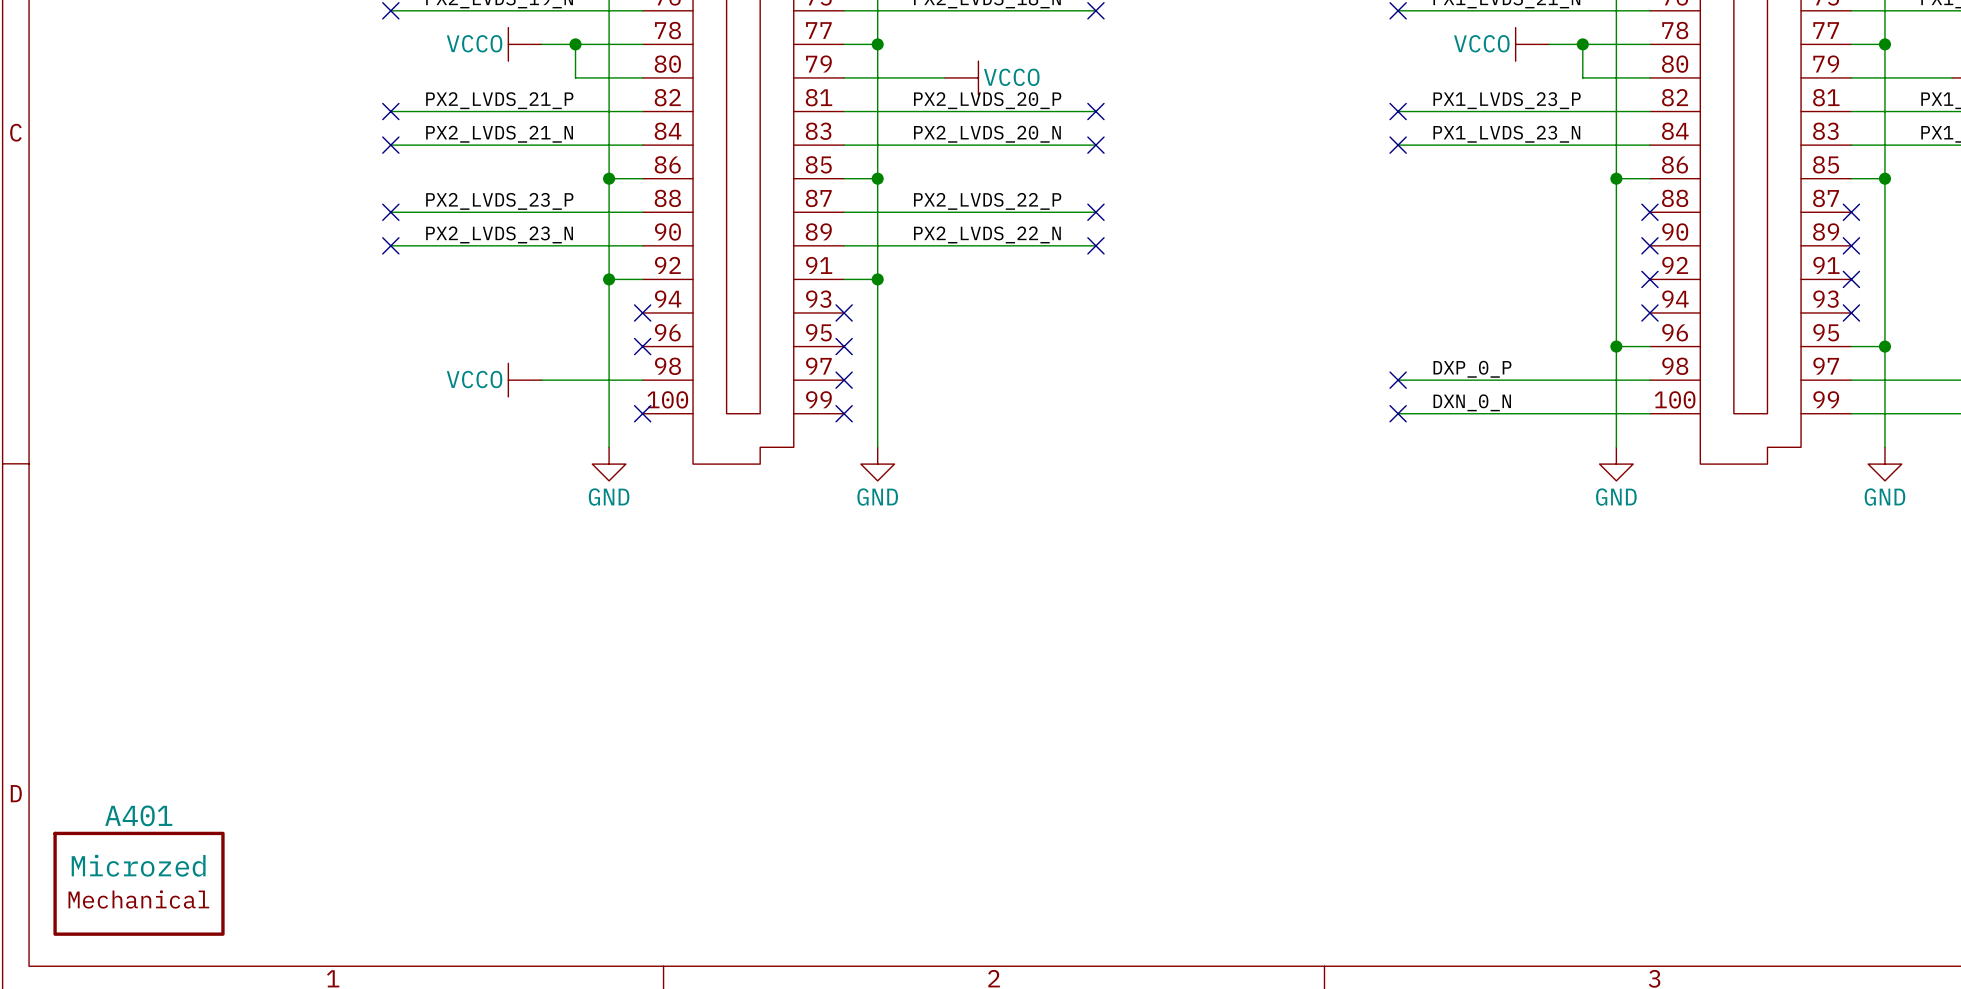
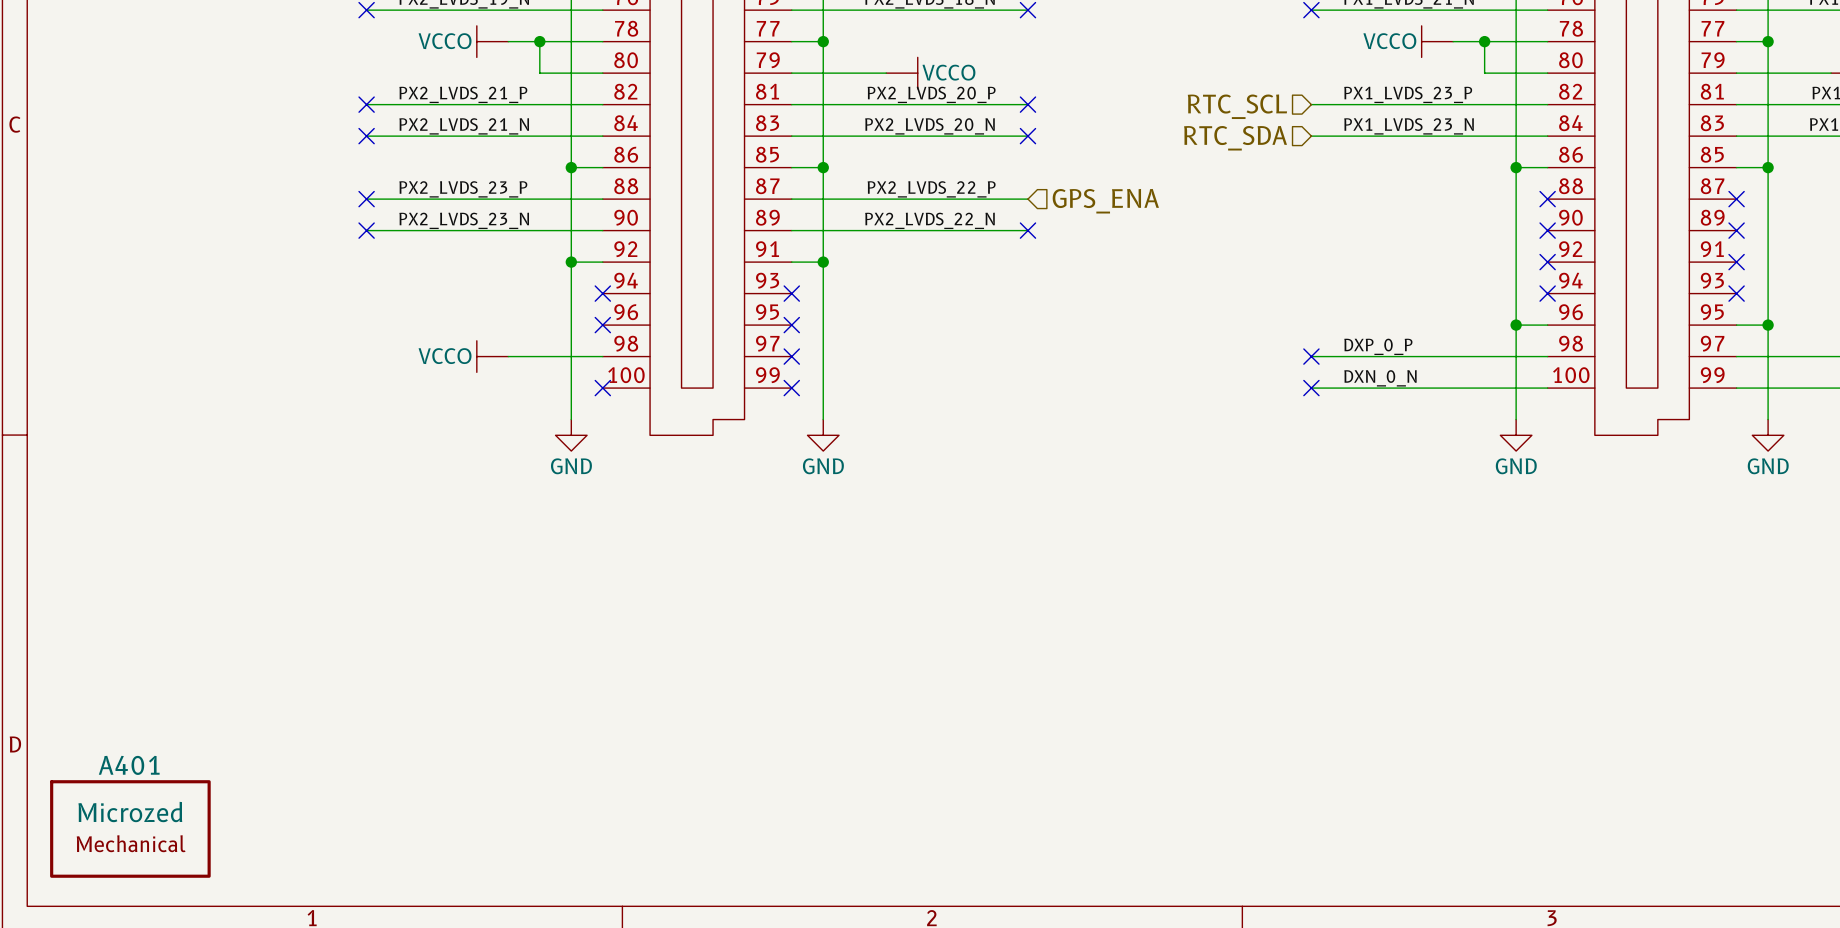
no-connect mark: (1398, 111) -> none
hierarchical label: none -> RTC_SCL (1237, 106)
no-connect mark: (1398, 145) -> none
hierarchical label: none -> RTC_SDA (1235, 138)
no-connect mark: (1095, 212) -> none
hierarchical label: none -> GPS_ENA (1105, 201)

